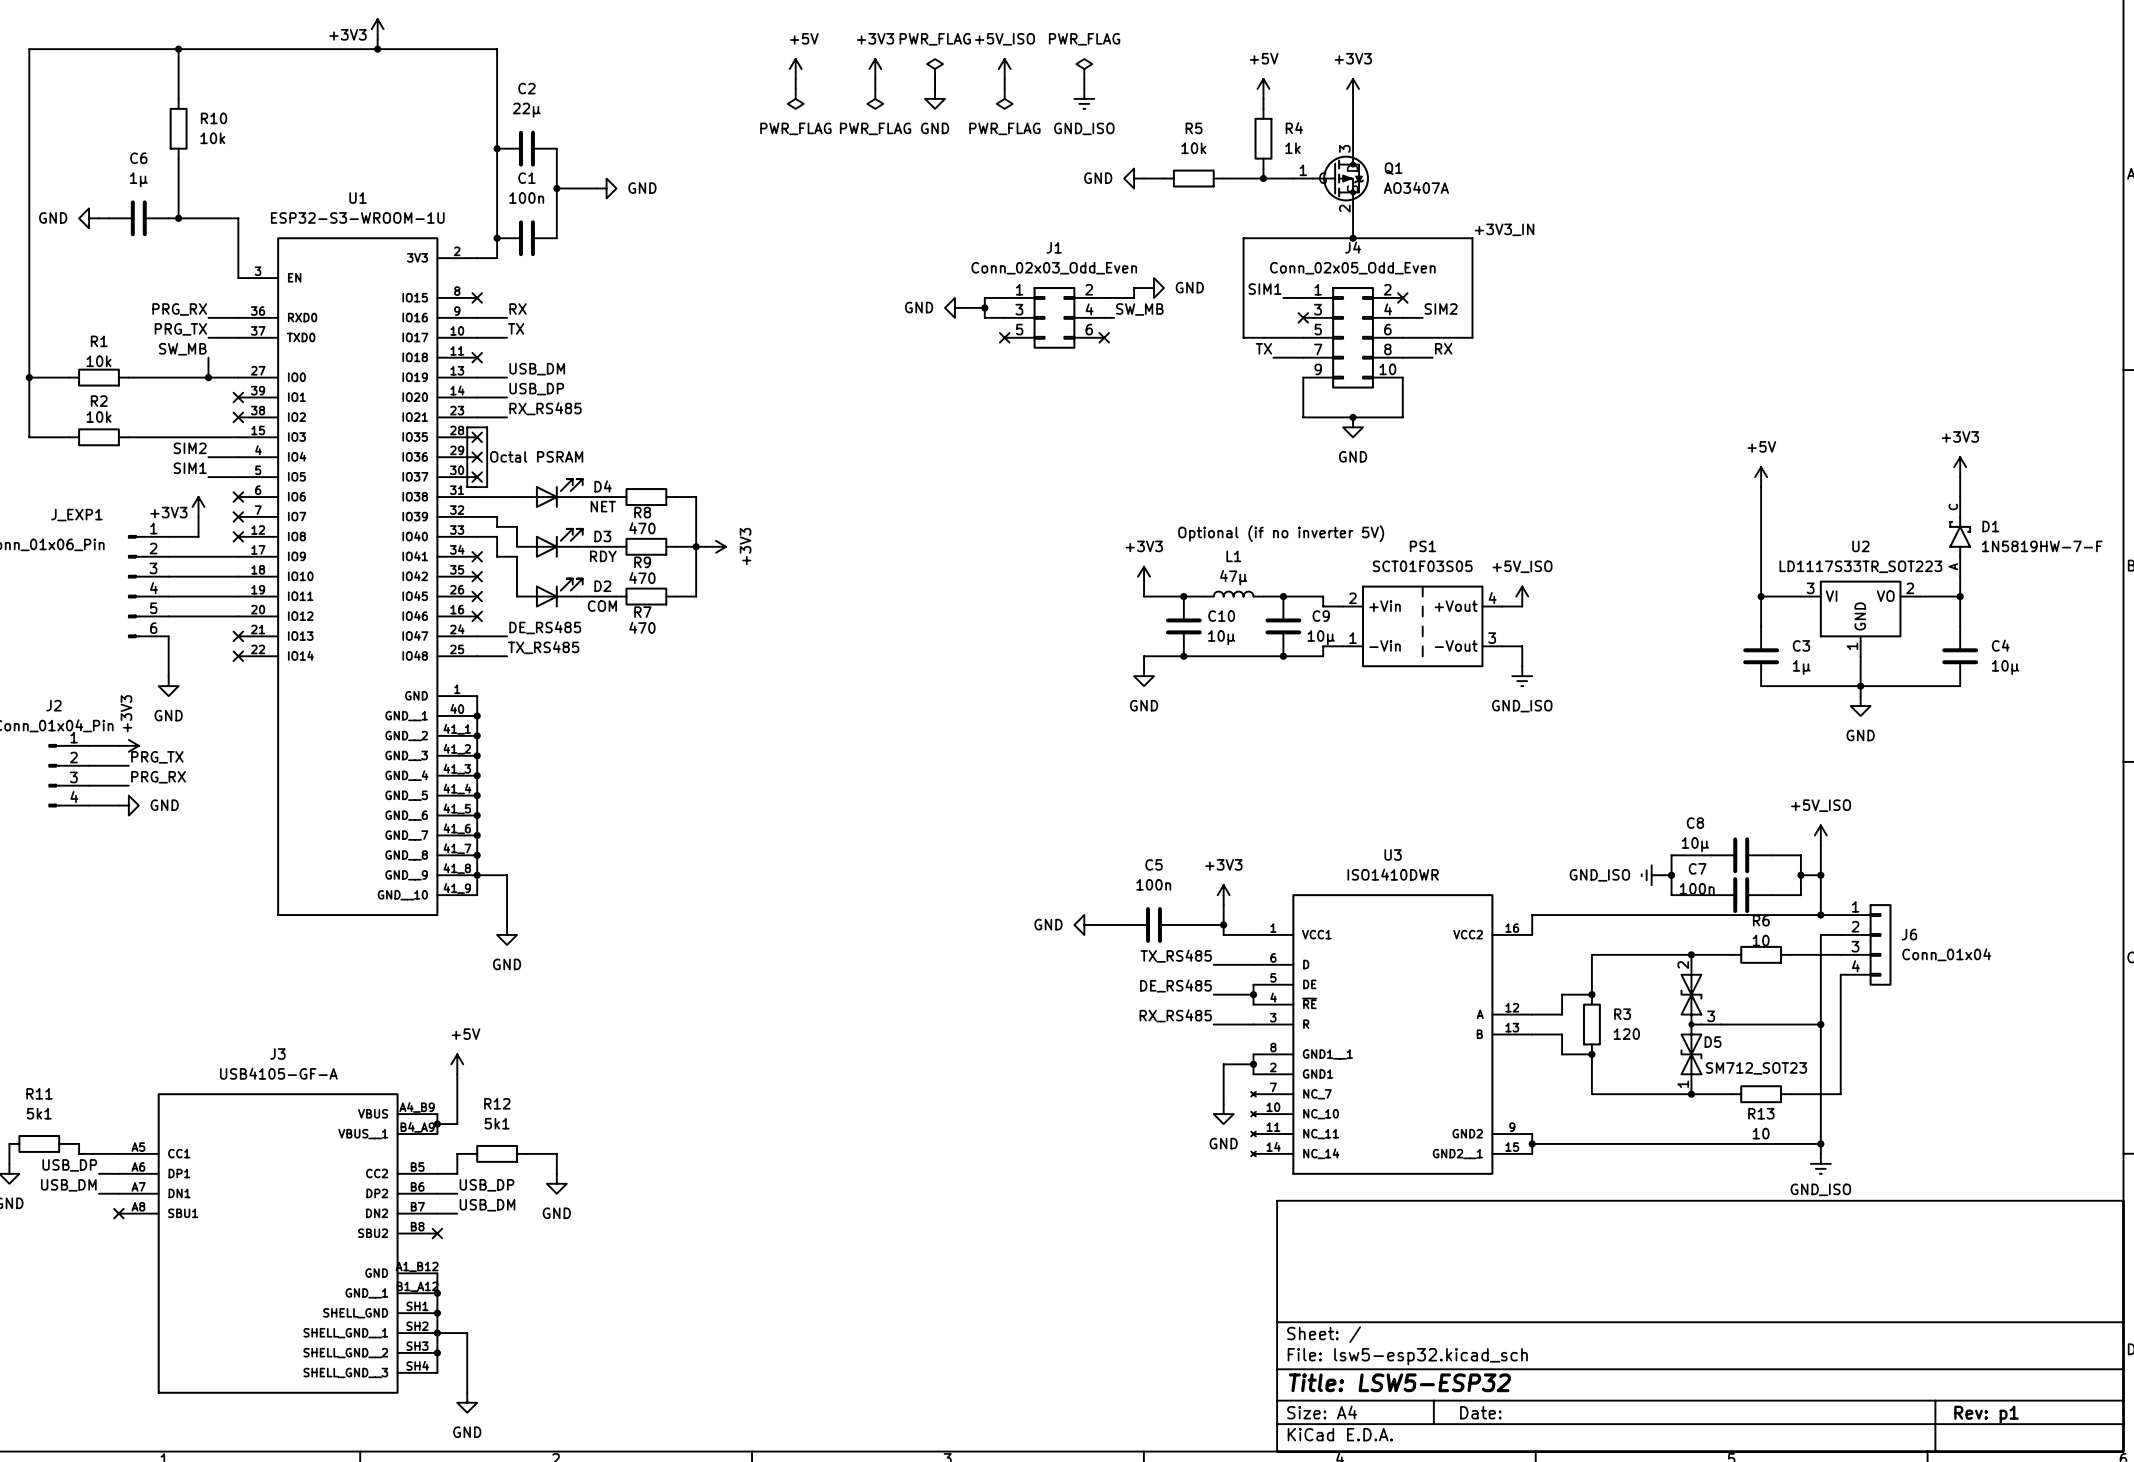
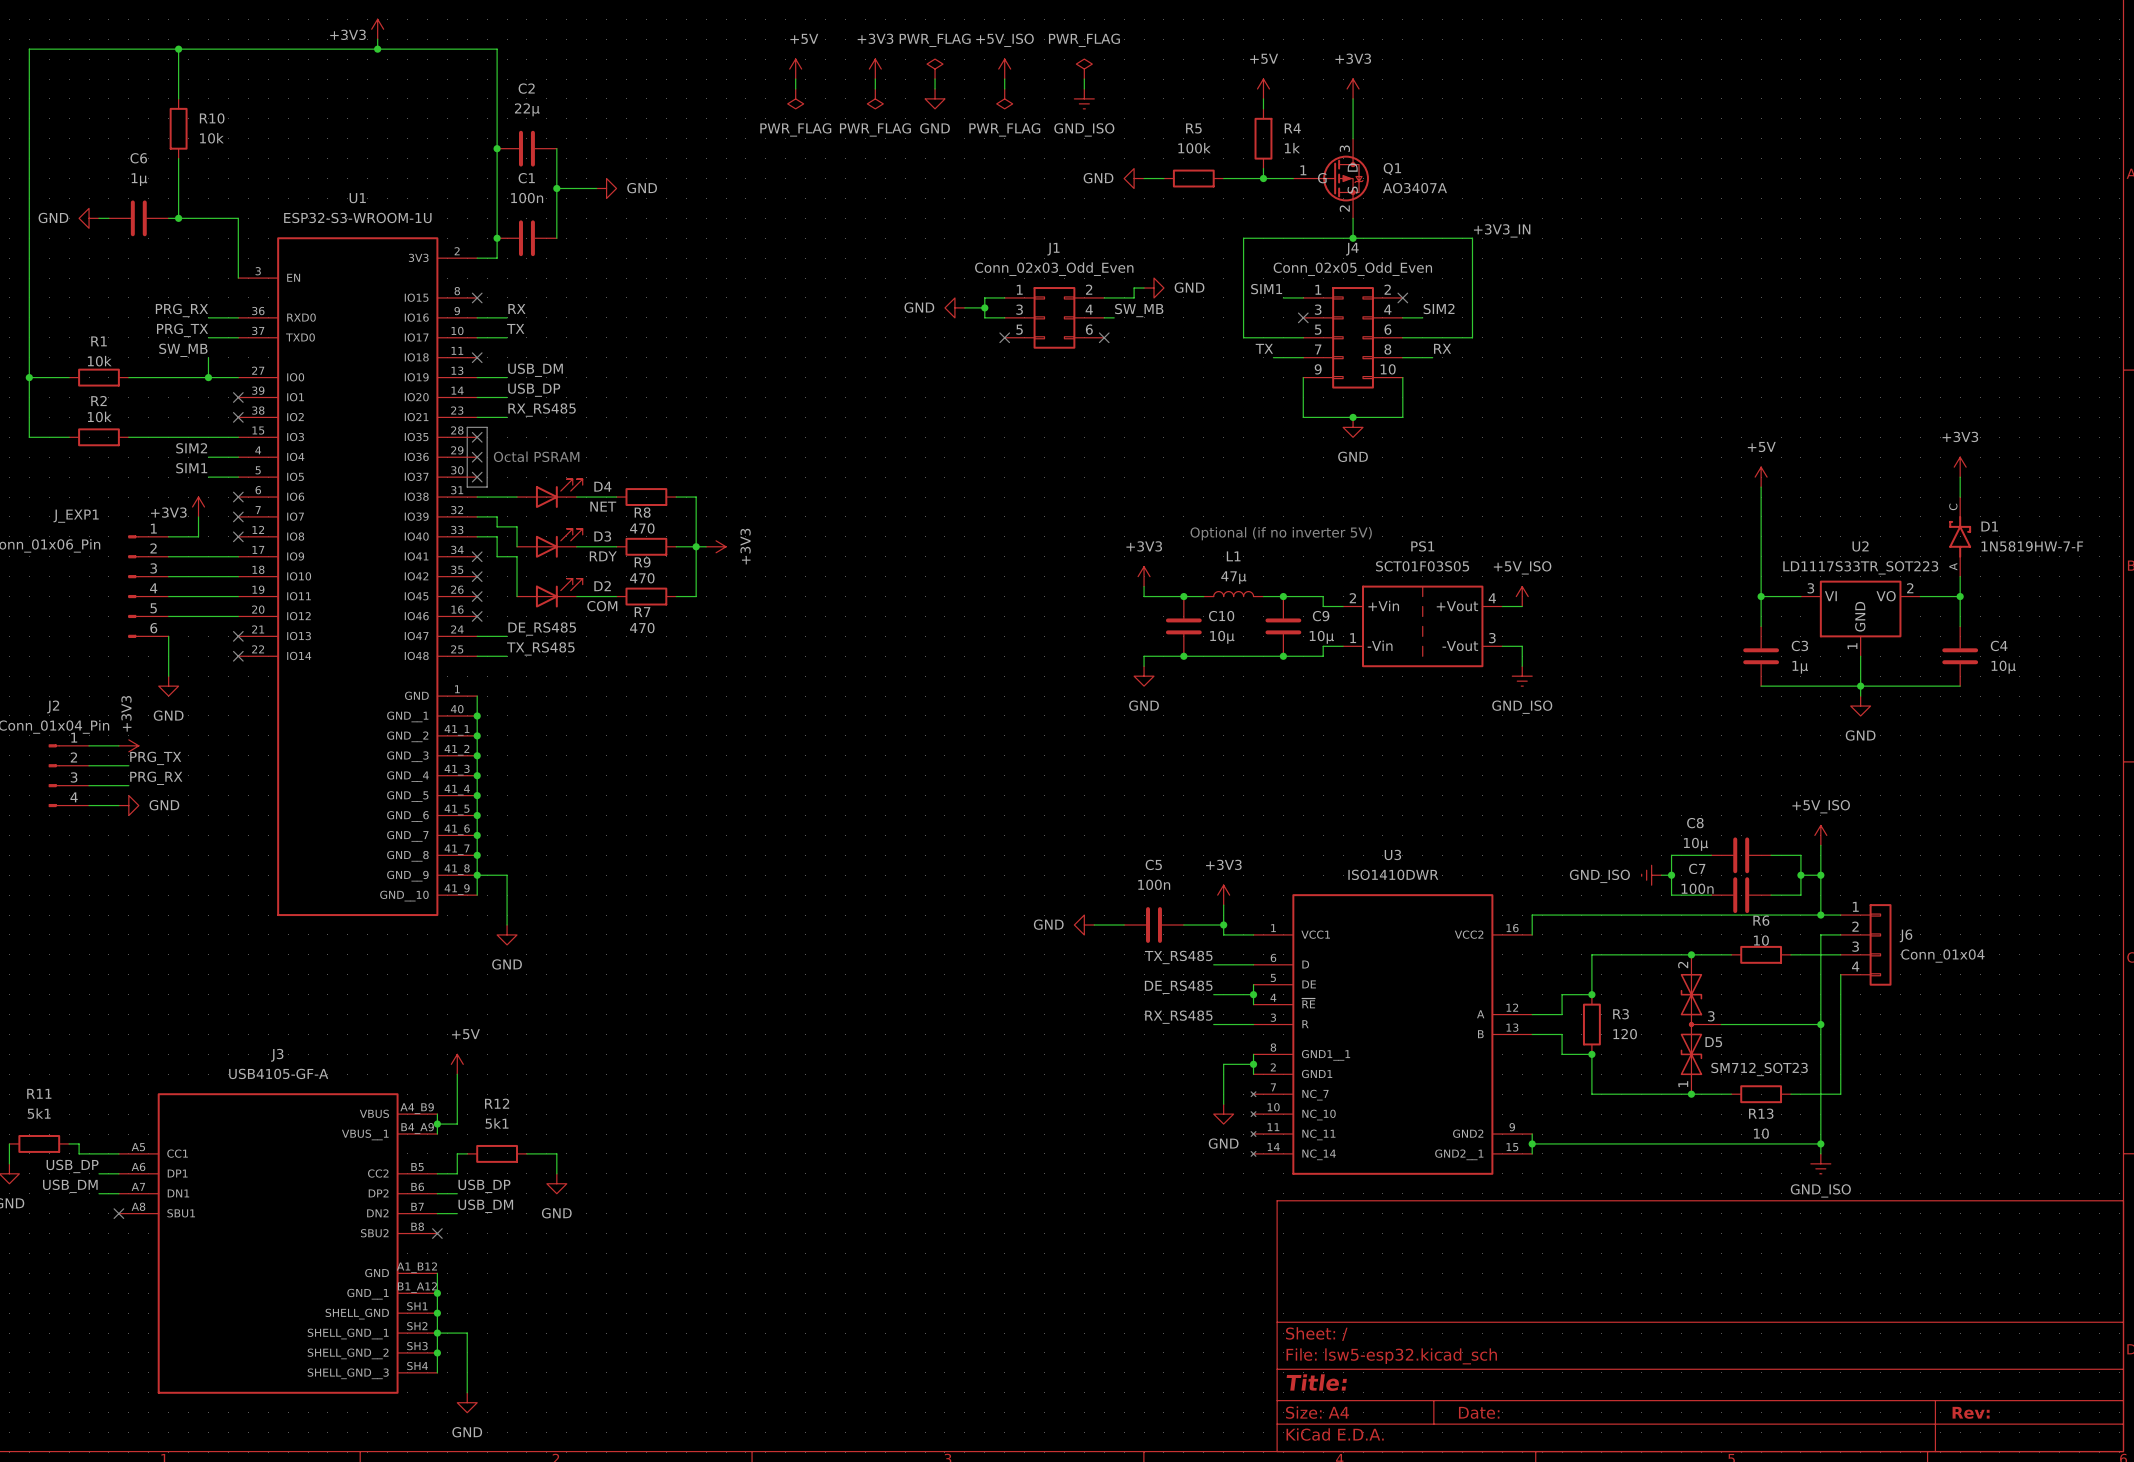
R5 value: 10k (1193, 148) -> 100k (1194, 148)
title block: Title: LSW5-ESP32 (1399, 1382) -> Title: (1316, 1382)
title block: Rev: p1 (1986, 1414) -> Rev: (1971, 1412)

